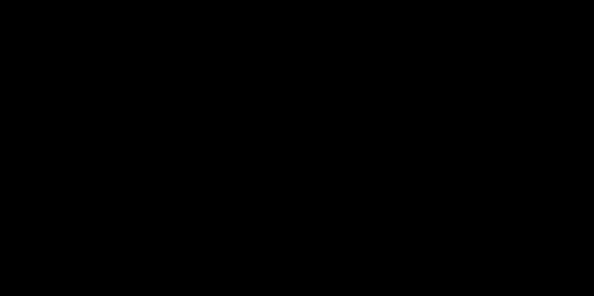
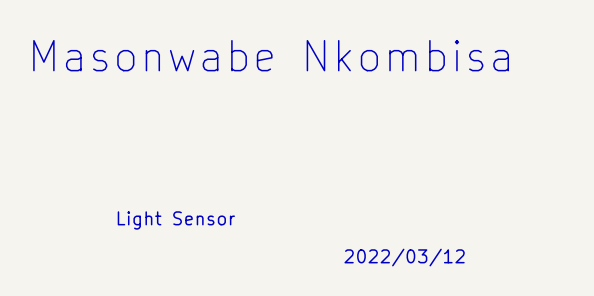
text: none -> Masonwabe Nkombisa (271, 55)
text: none -> Light Sensor (176, 220)
text: none -> 2022/03/12 (404, 257)

